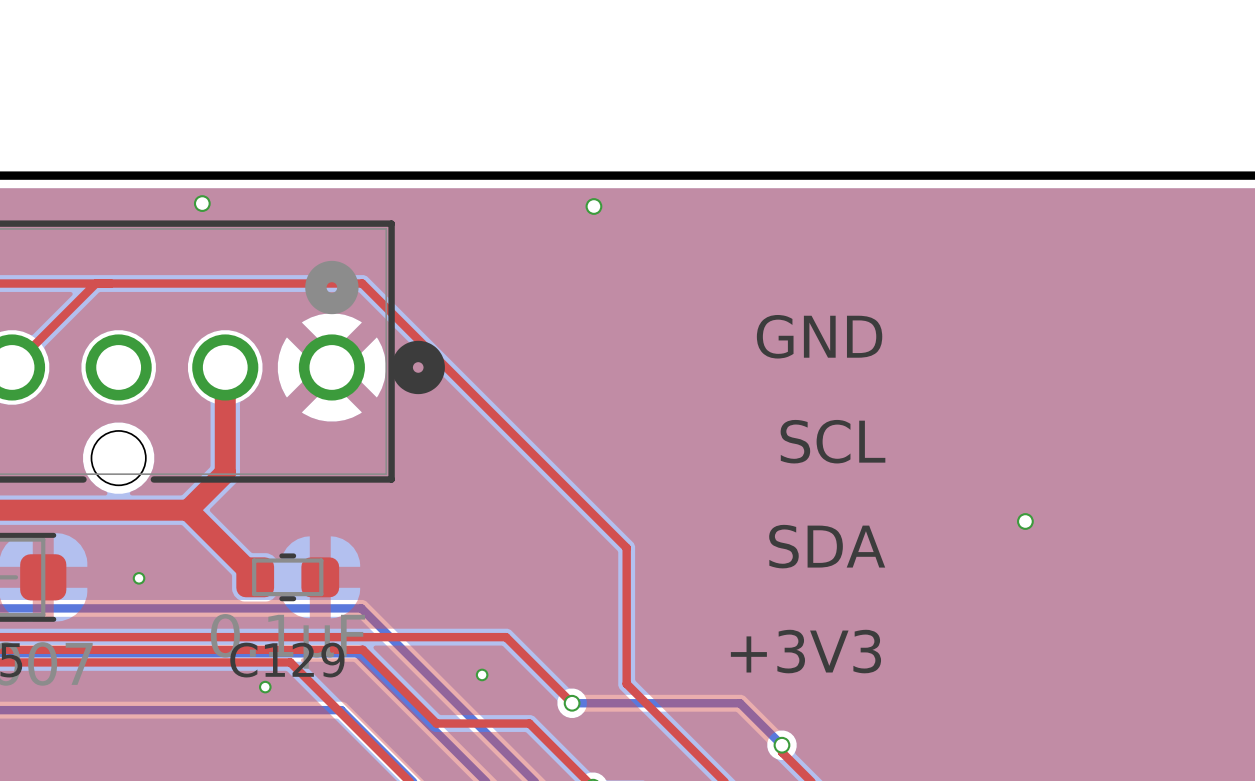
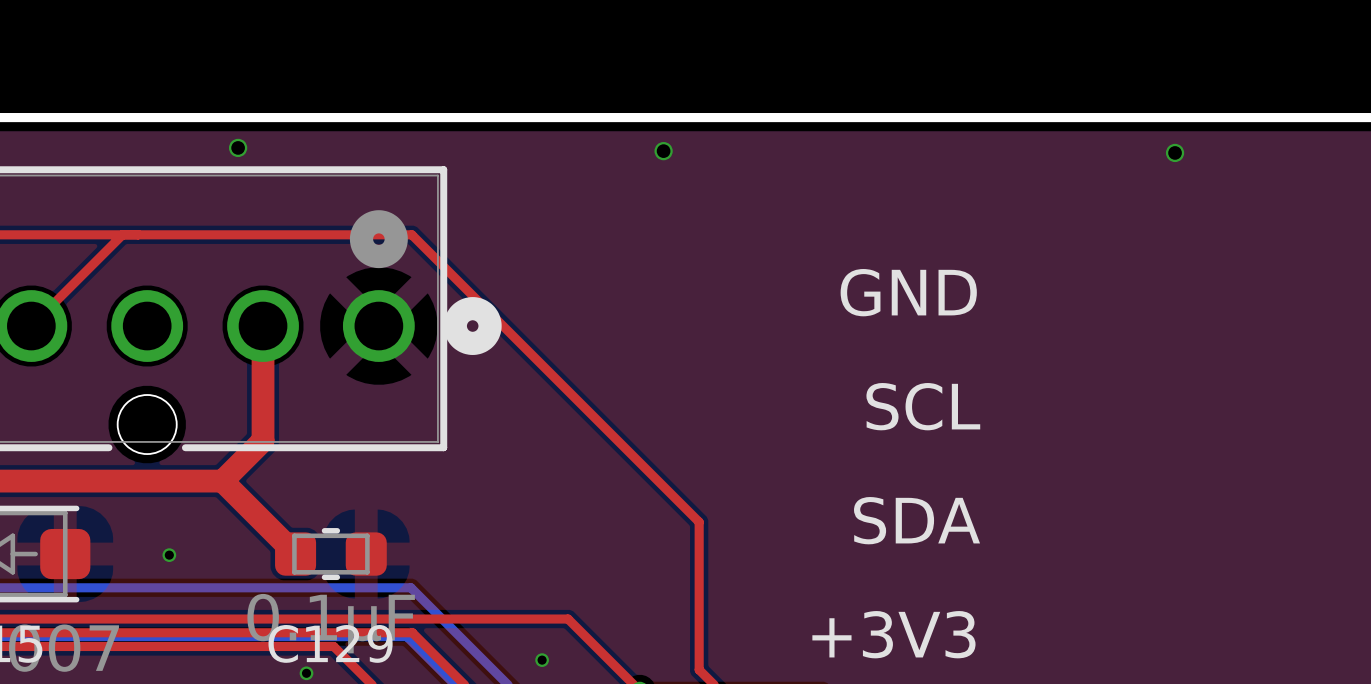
via: none -> (1175, 152)
via: (1025, 521) -> none

